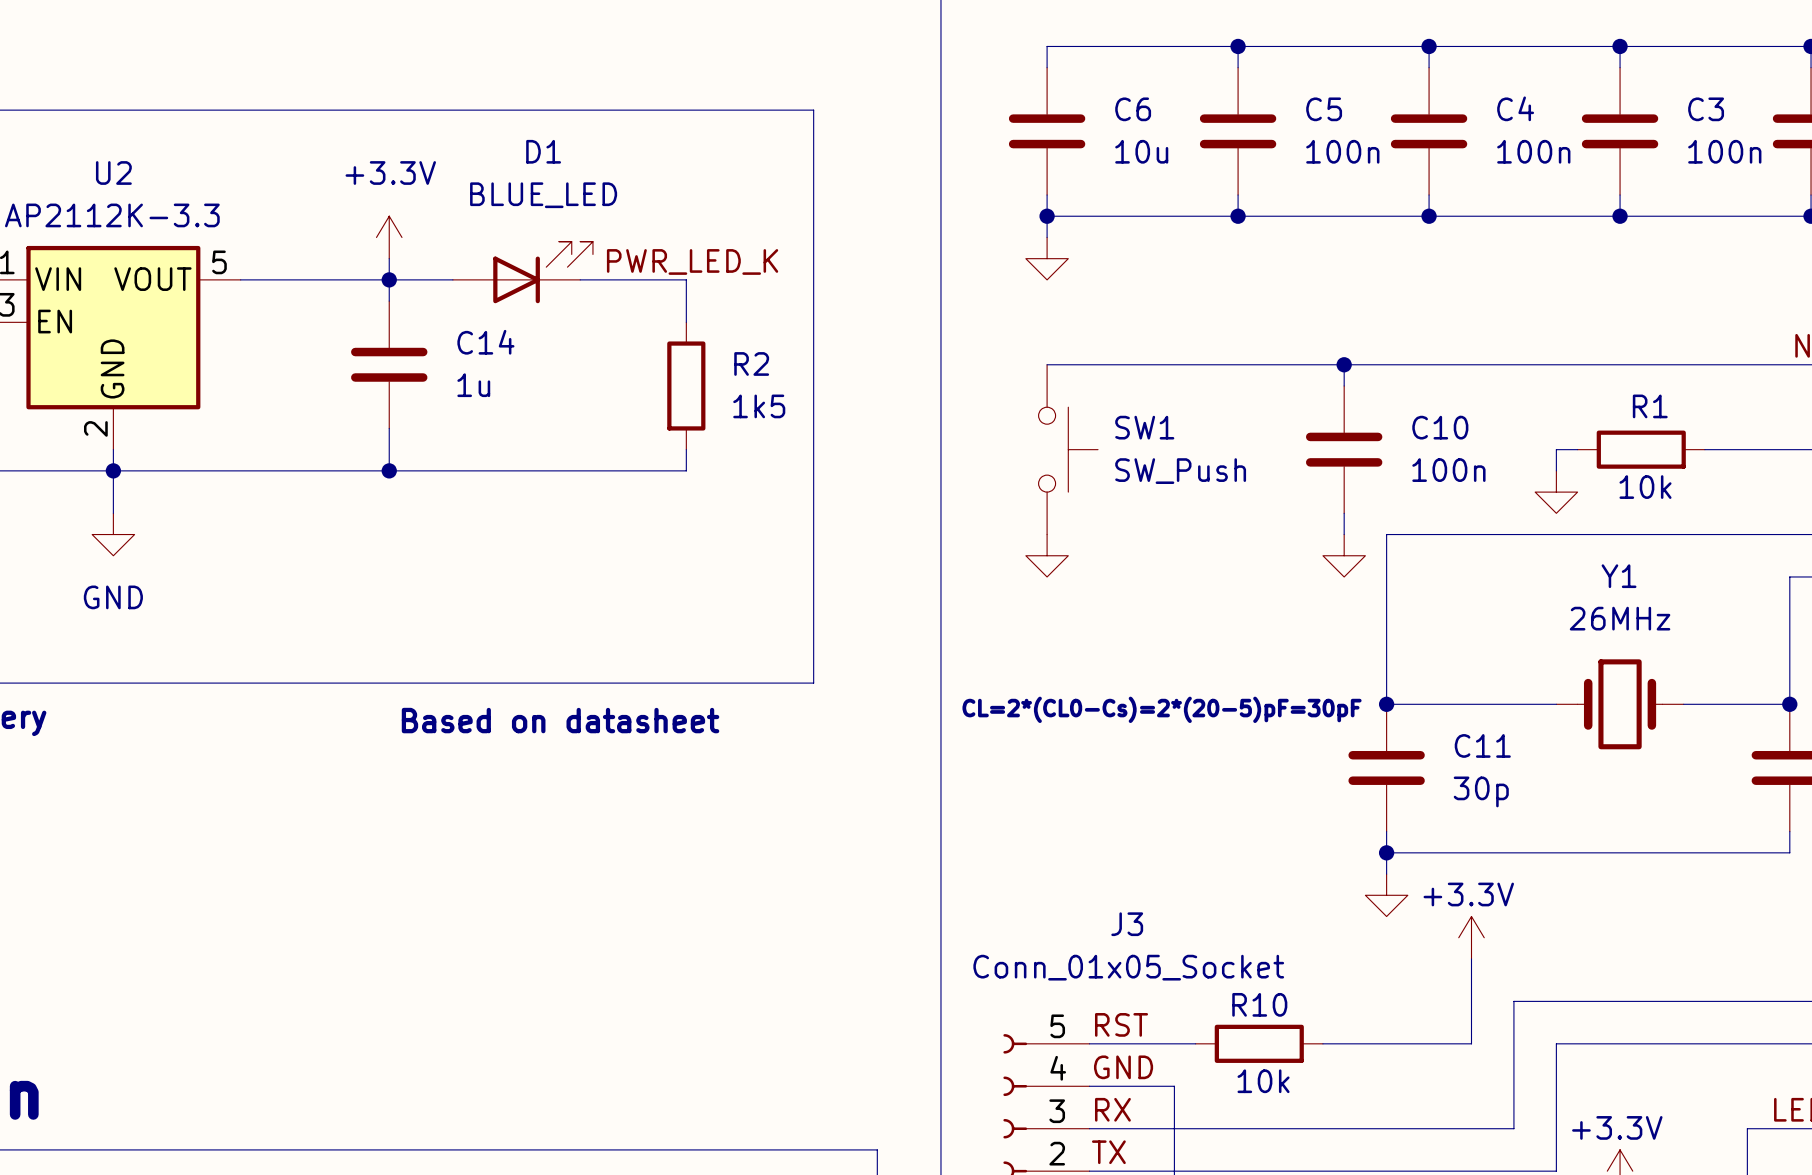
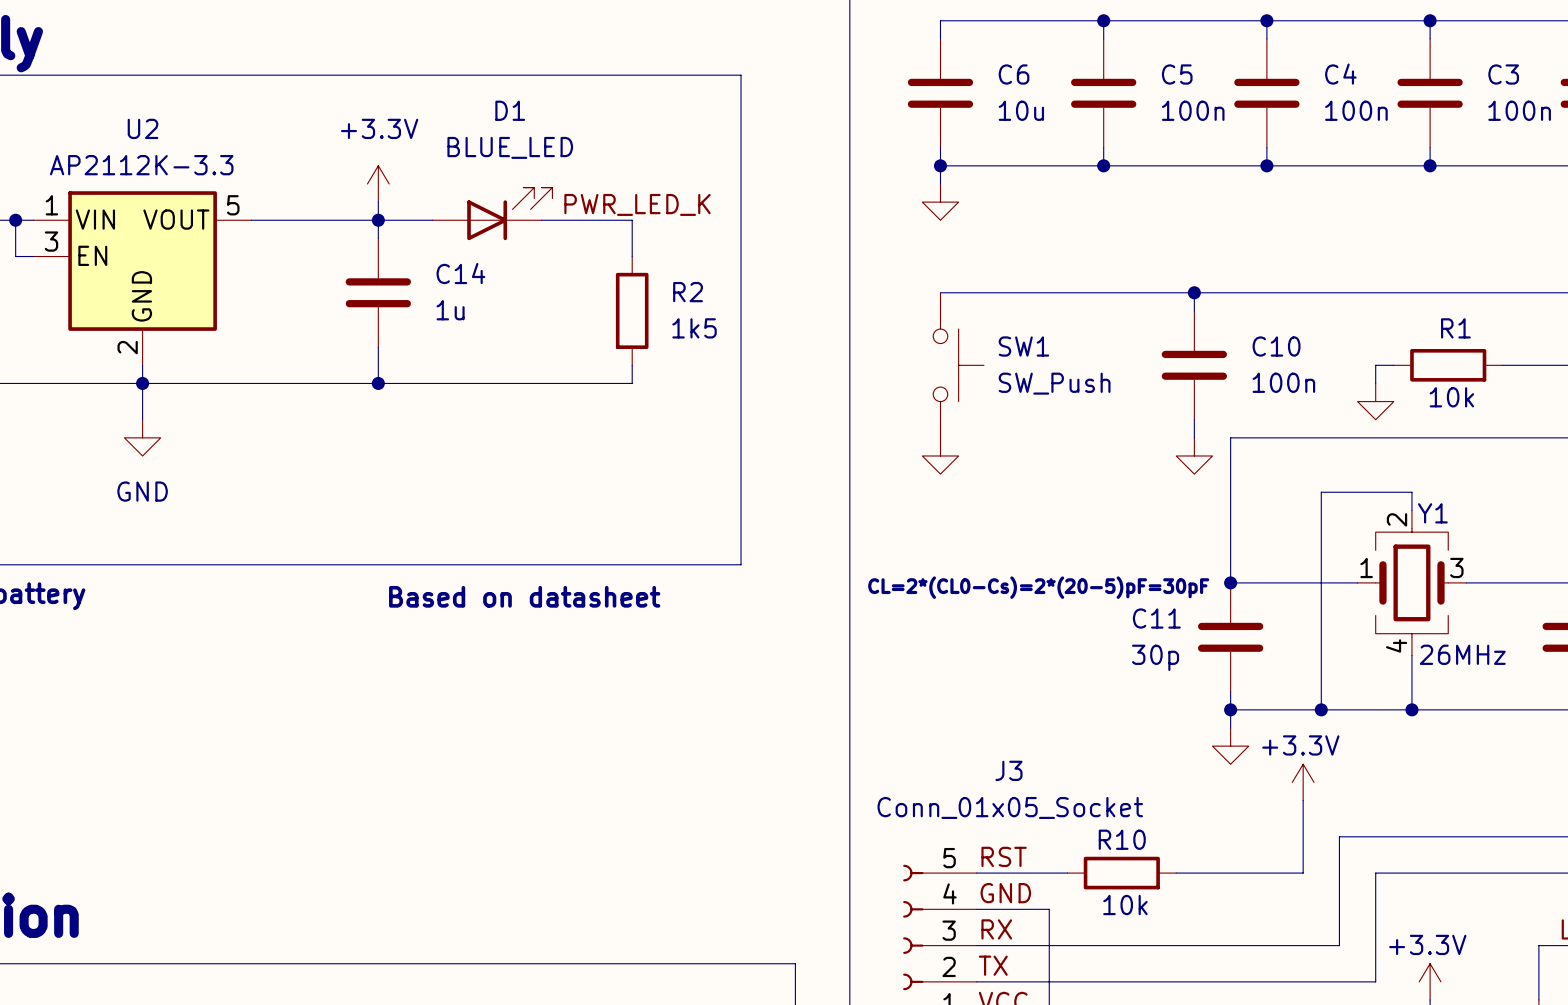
Y1 name position: Y1 (1619, 576) -> Y1 (1432, 513)
Y1 value position: 26MHz (1620, 618) -> 26MHz (1462, 654)
wire: none -> (1411, 510) (1411, 492) (1321, 492) (1321, 709)
Y1 symbol: [1556, 659, 1684, 750] -> [1357, 510, 1467, 656]
C11 name position: C11 (1482, 745) -> C11 (1156, 618)
wire: none -> (1411, 655) (1411, 709)
C11 value position: 30p (1481, 791) -> 30p (1155, 657)
junction: none -> (1321, 709)
junction: none -> (1411, 709)

